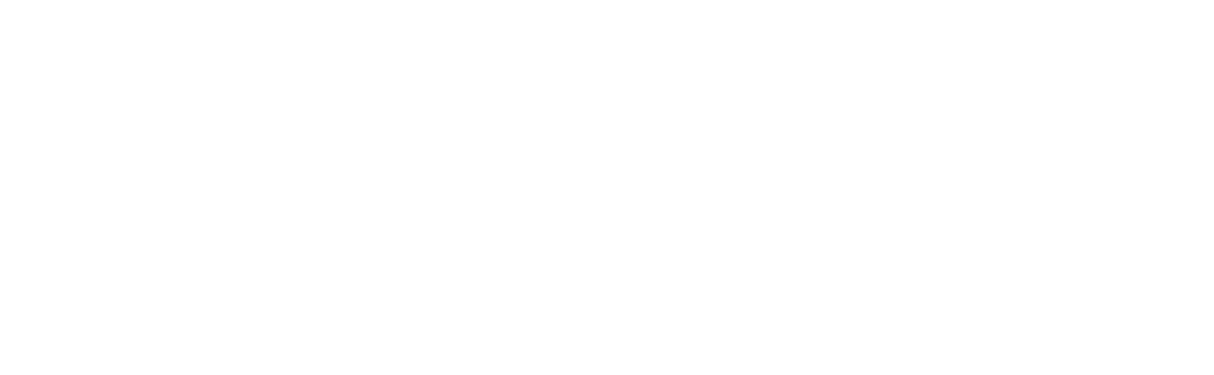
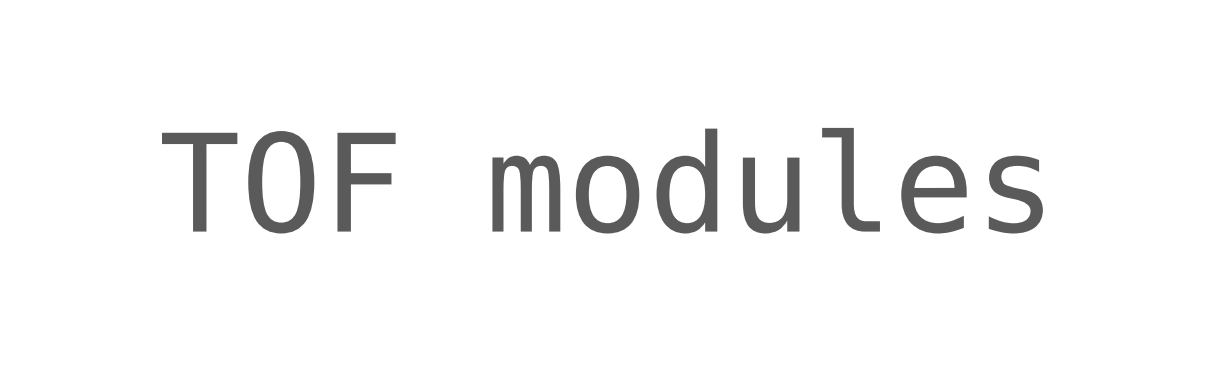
text: none -> TOF modules (602, 180)

